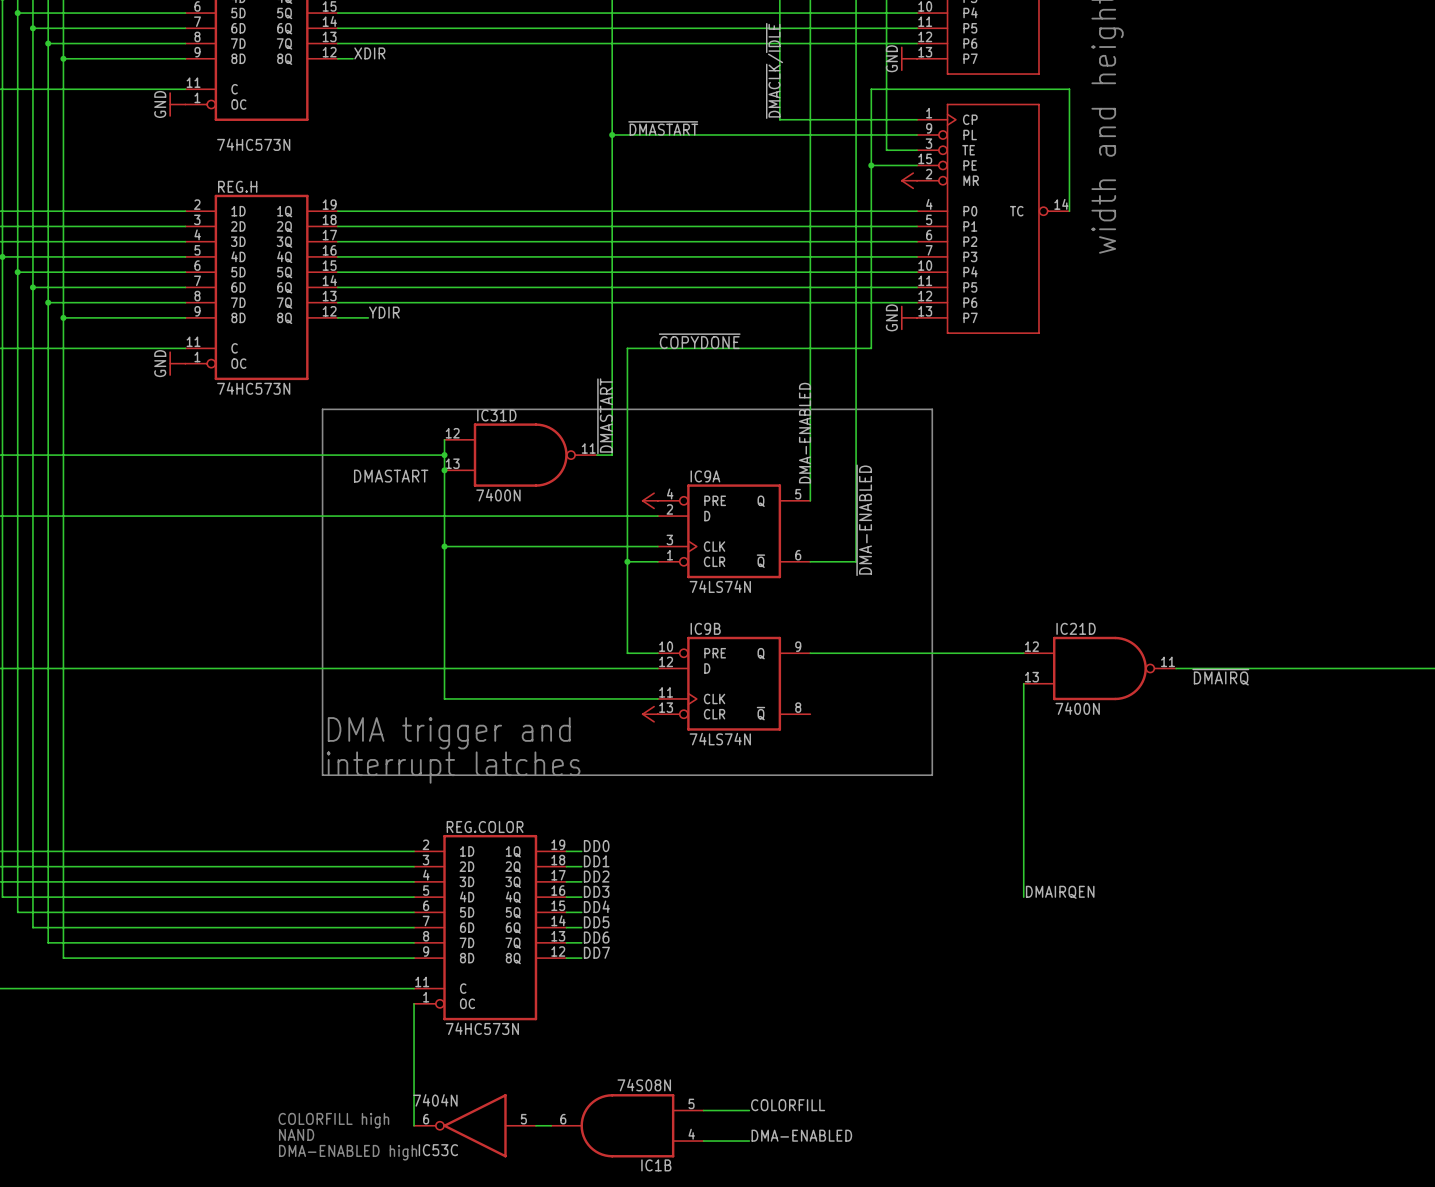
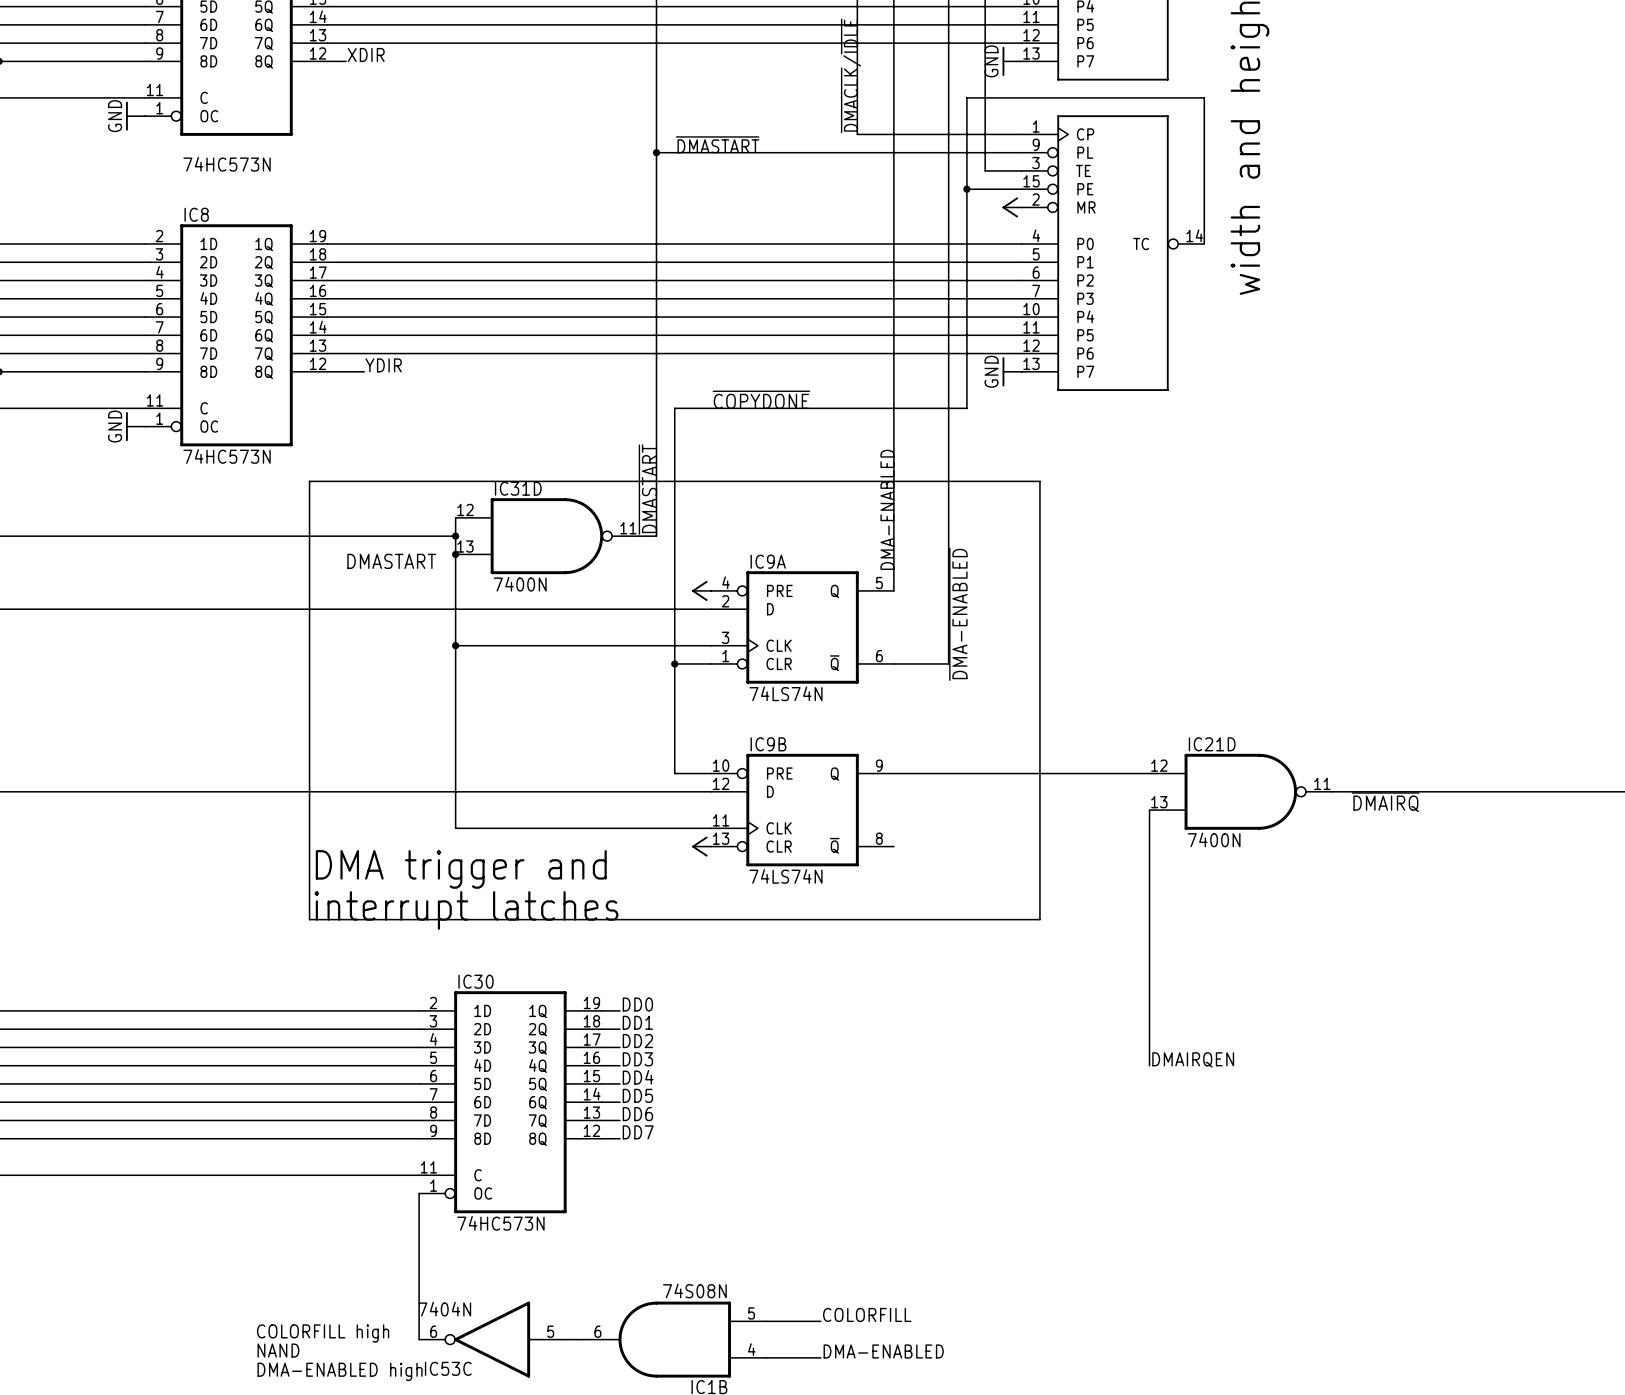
REG.H name: REG.H (237, 186) -> IC8 (196, 214)
REG.COLOR name: REG.COLOR (485, 827) -> IC30 (476, 981)

